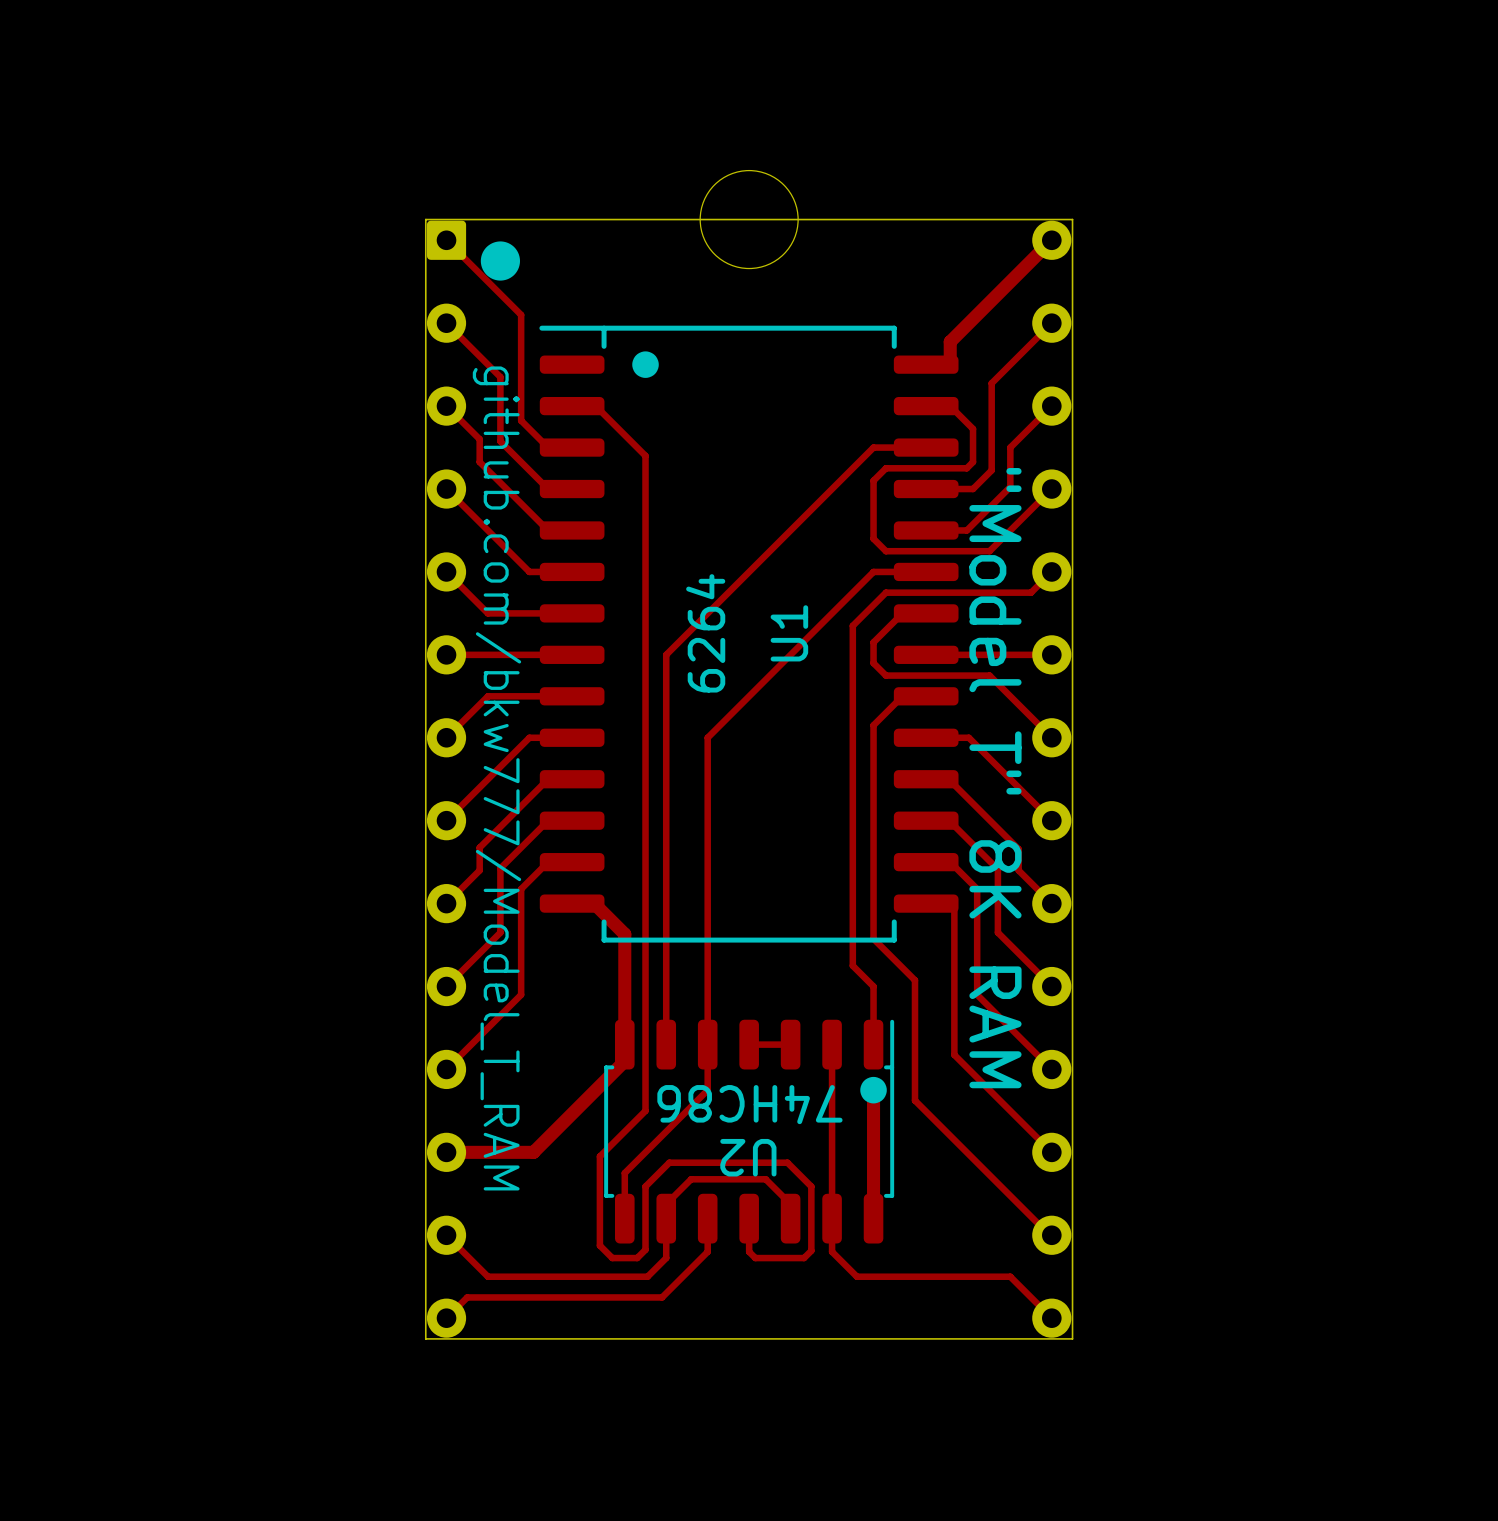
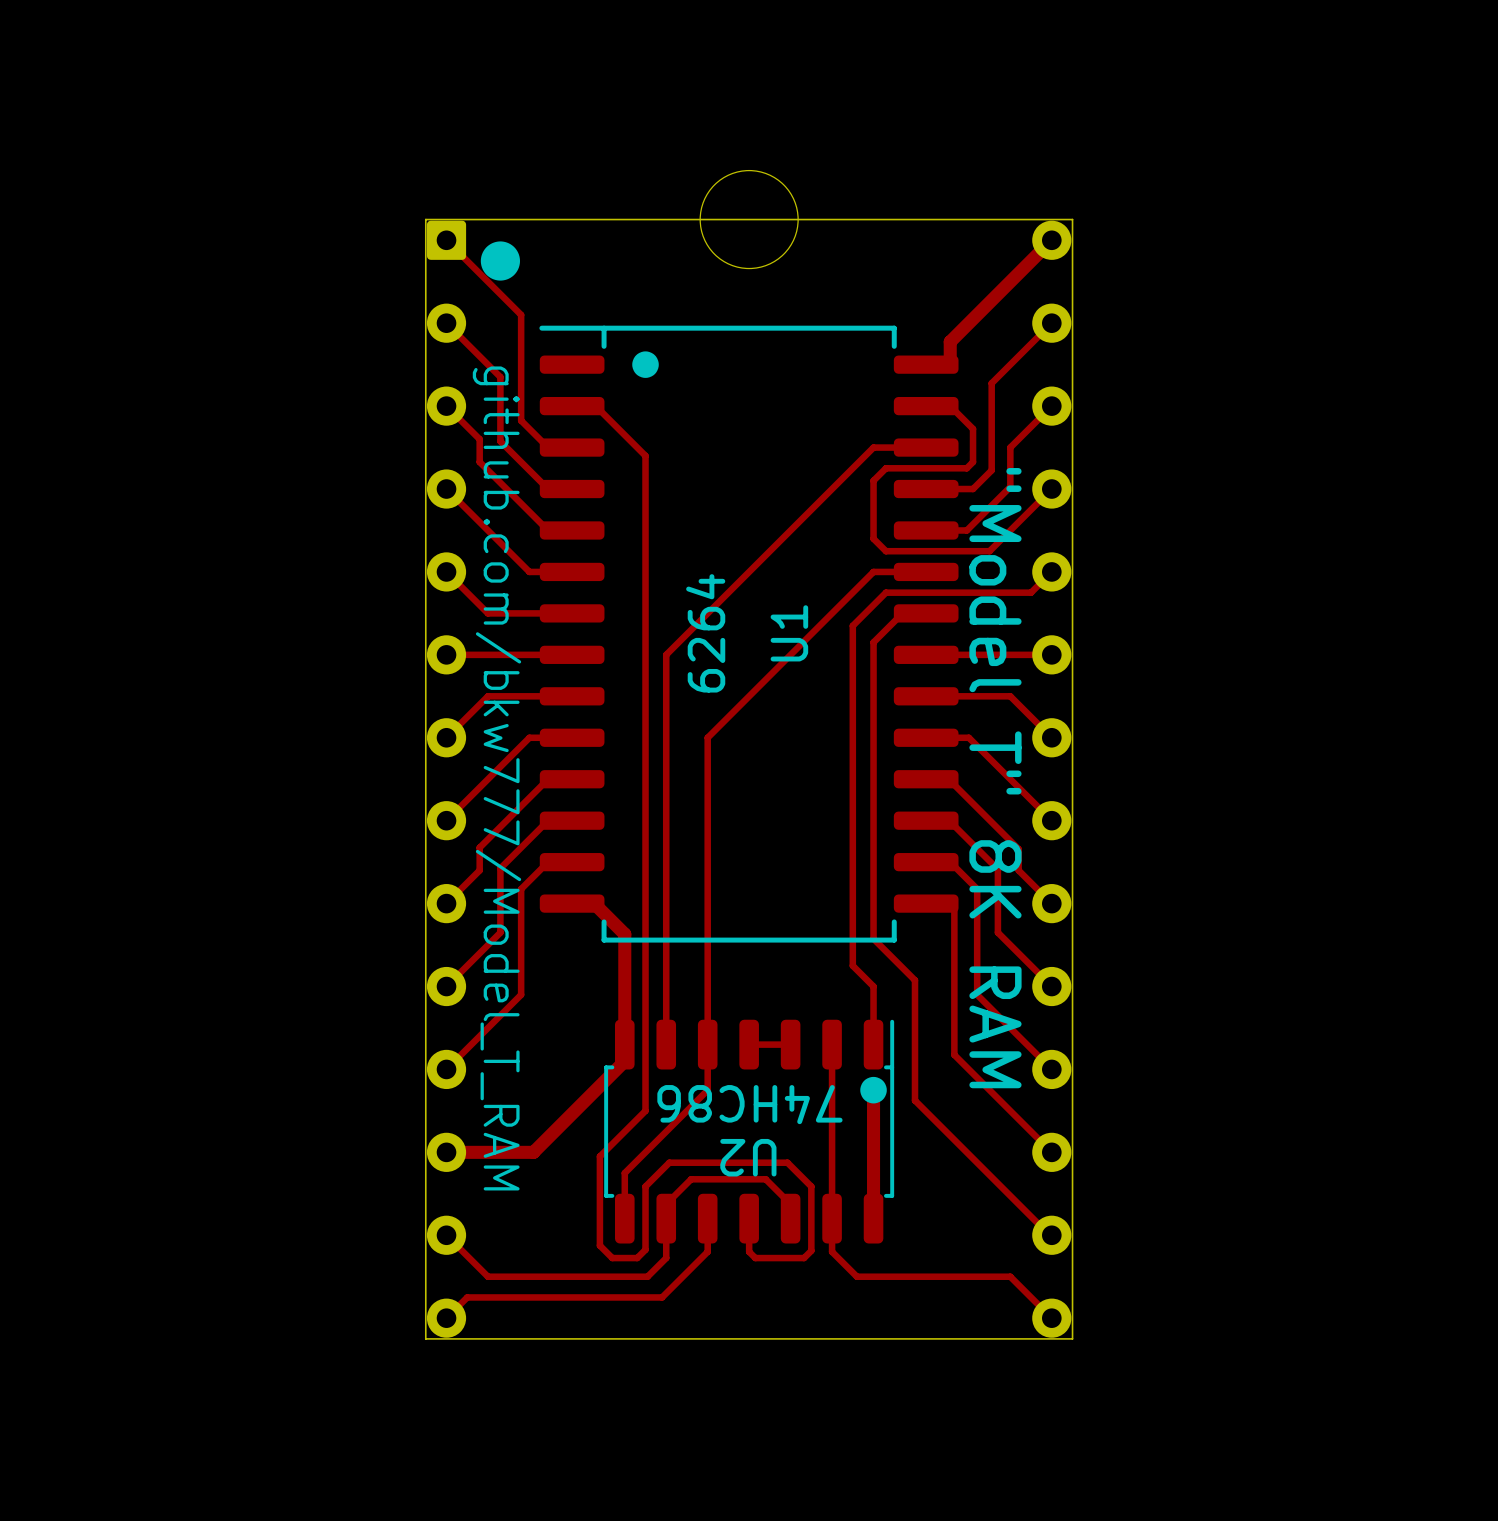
track: (873, 663) (885, 675) (989, 675) (1010, 696) -> (926, 696) (1010, 696)
track: (926, 696) (902, 696) (873, 725) -> (873, 663) (873, 725)

